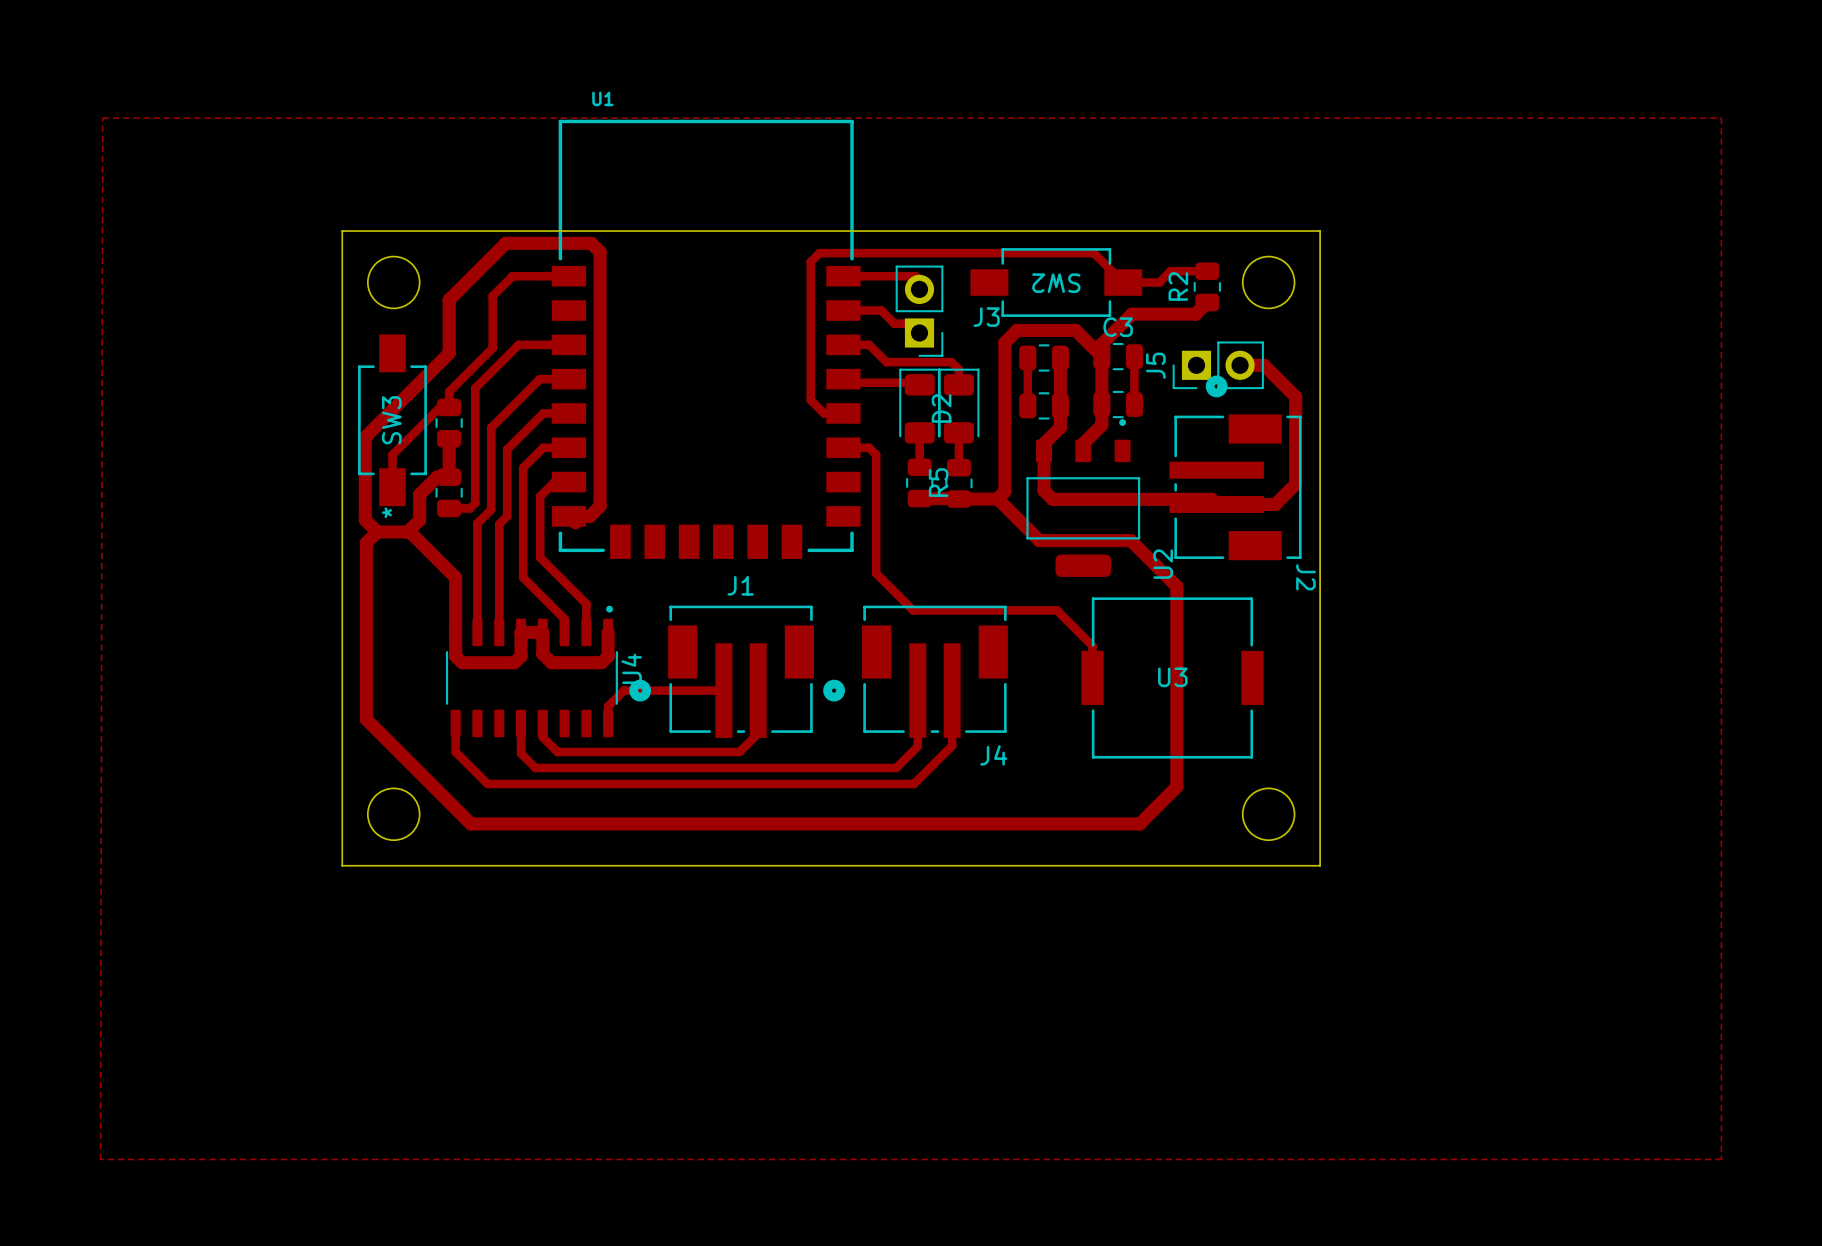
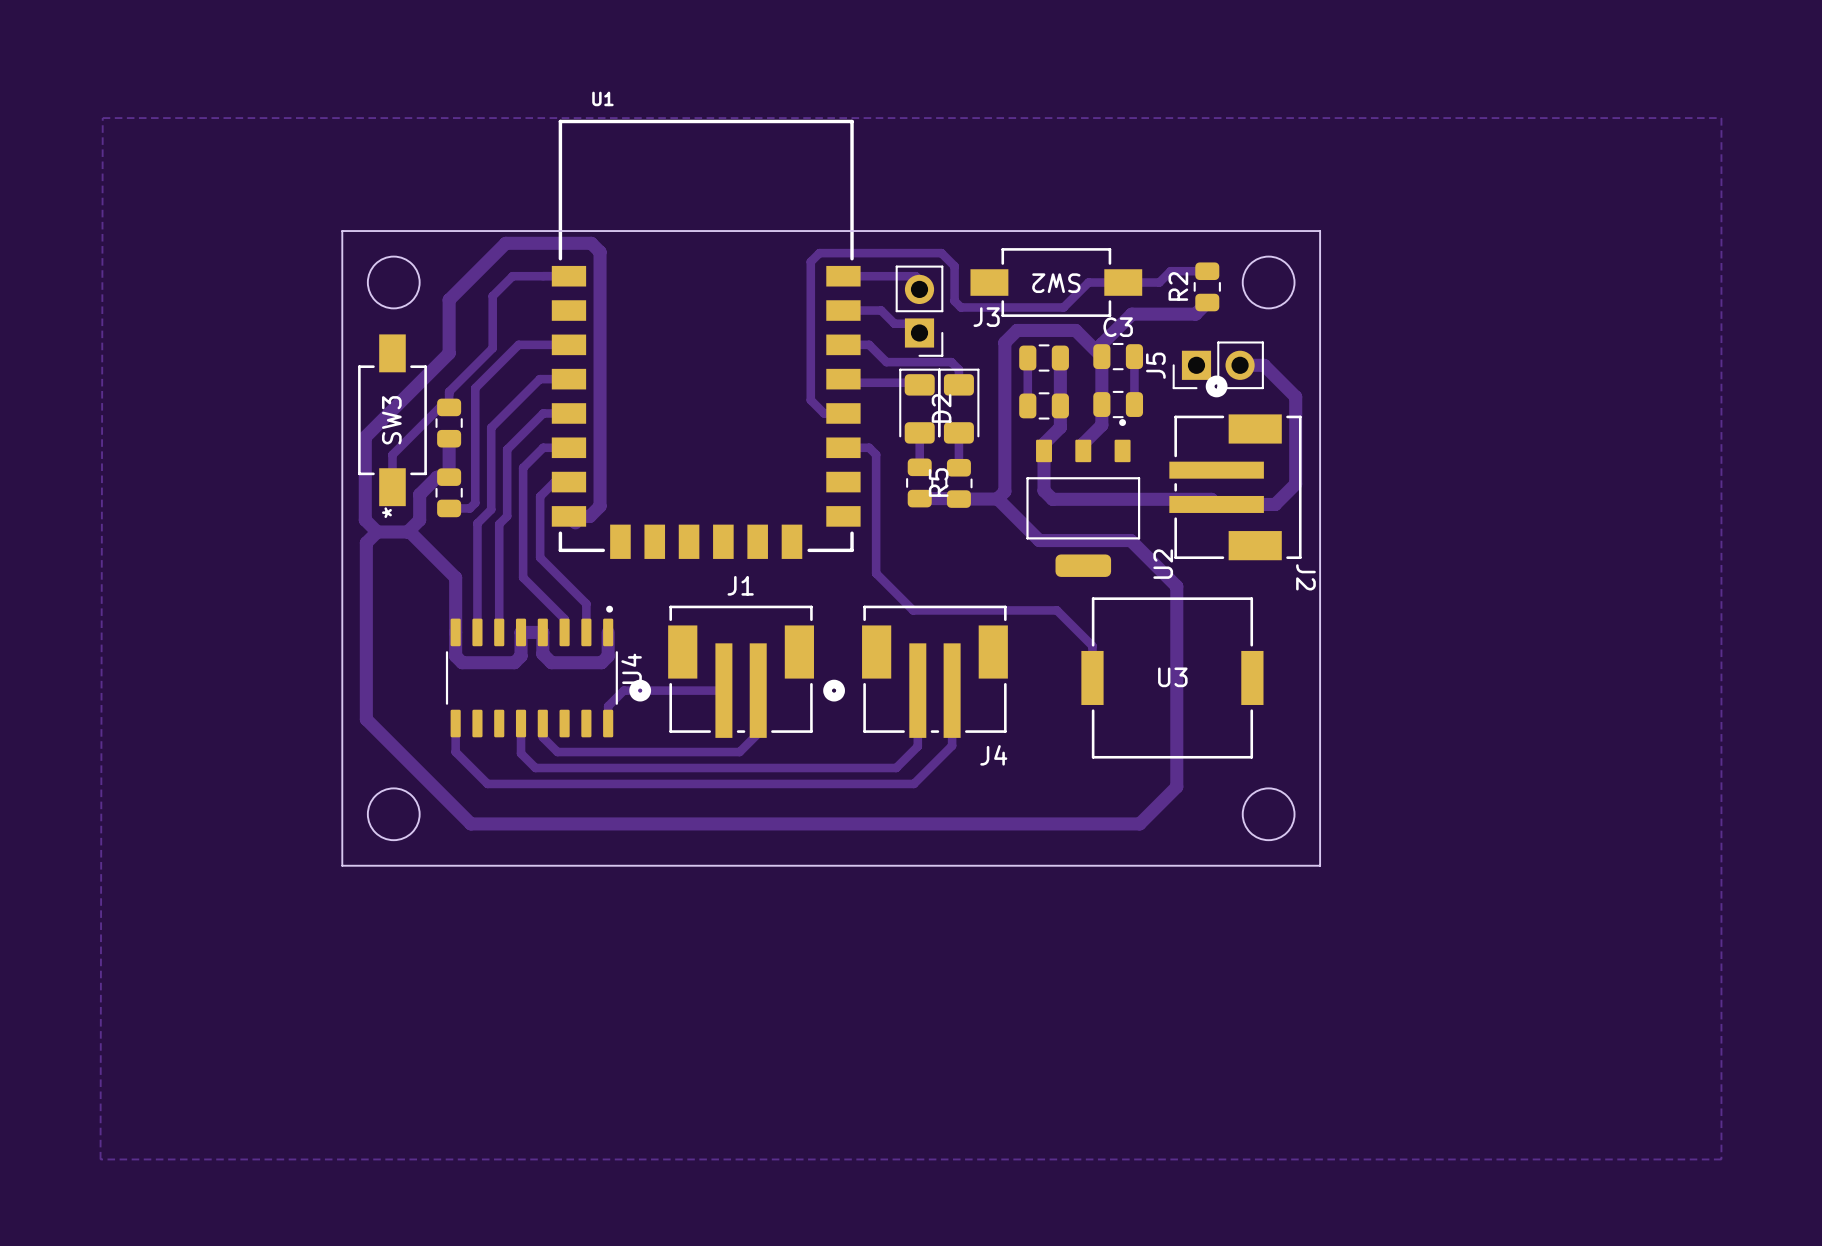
track: (941, 253) (1093, 253) (1123, 282) -> (941, 253) (954, 266) (954, 301) (960, 307) (1063, 307) (1088, 282) (1121, 282)

